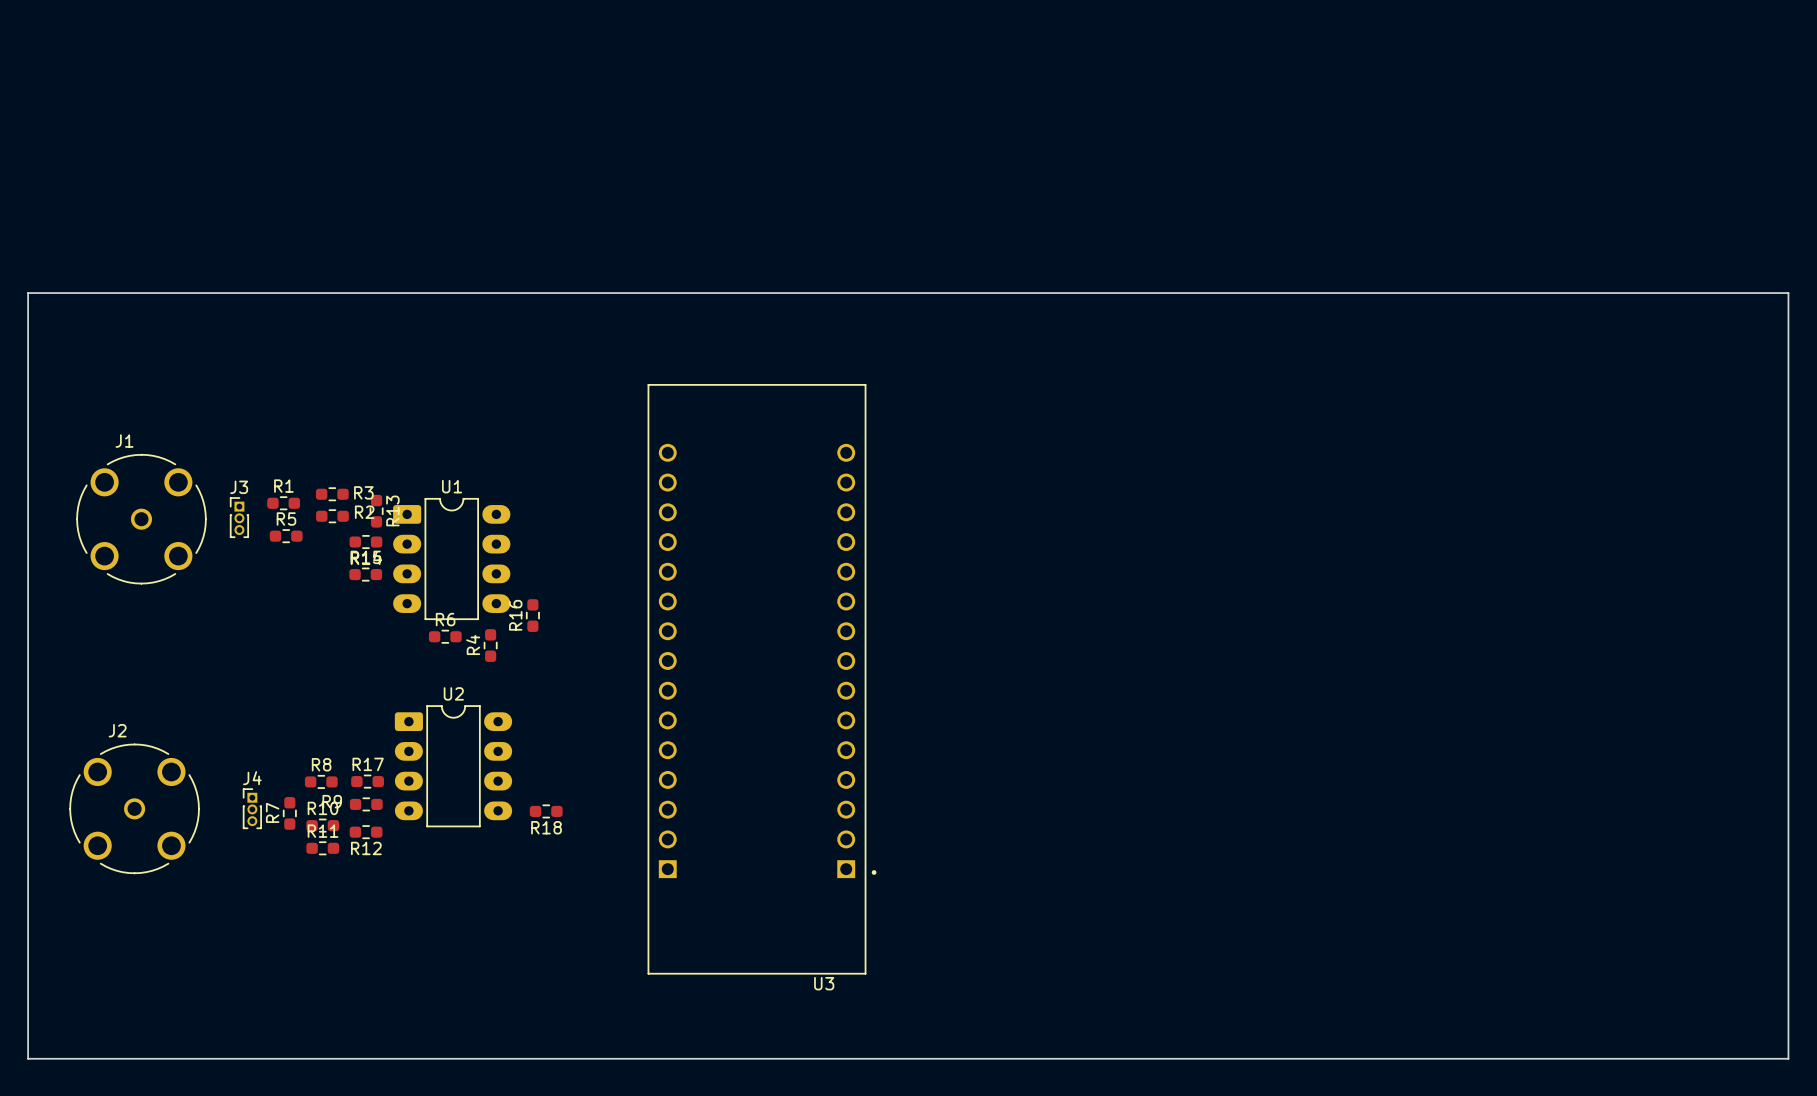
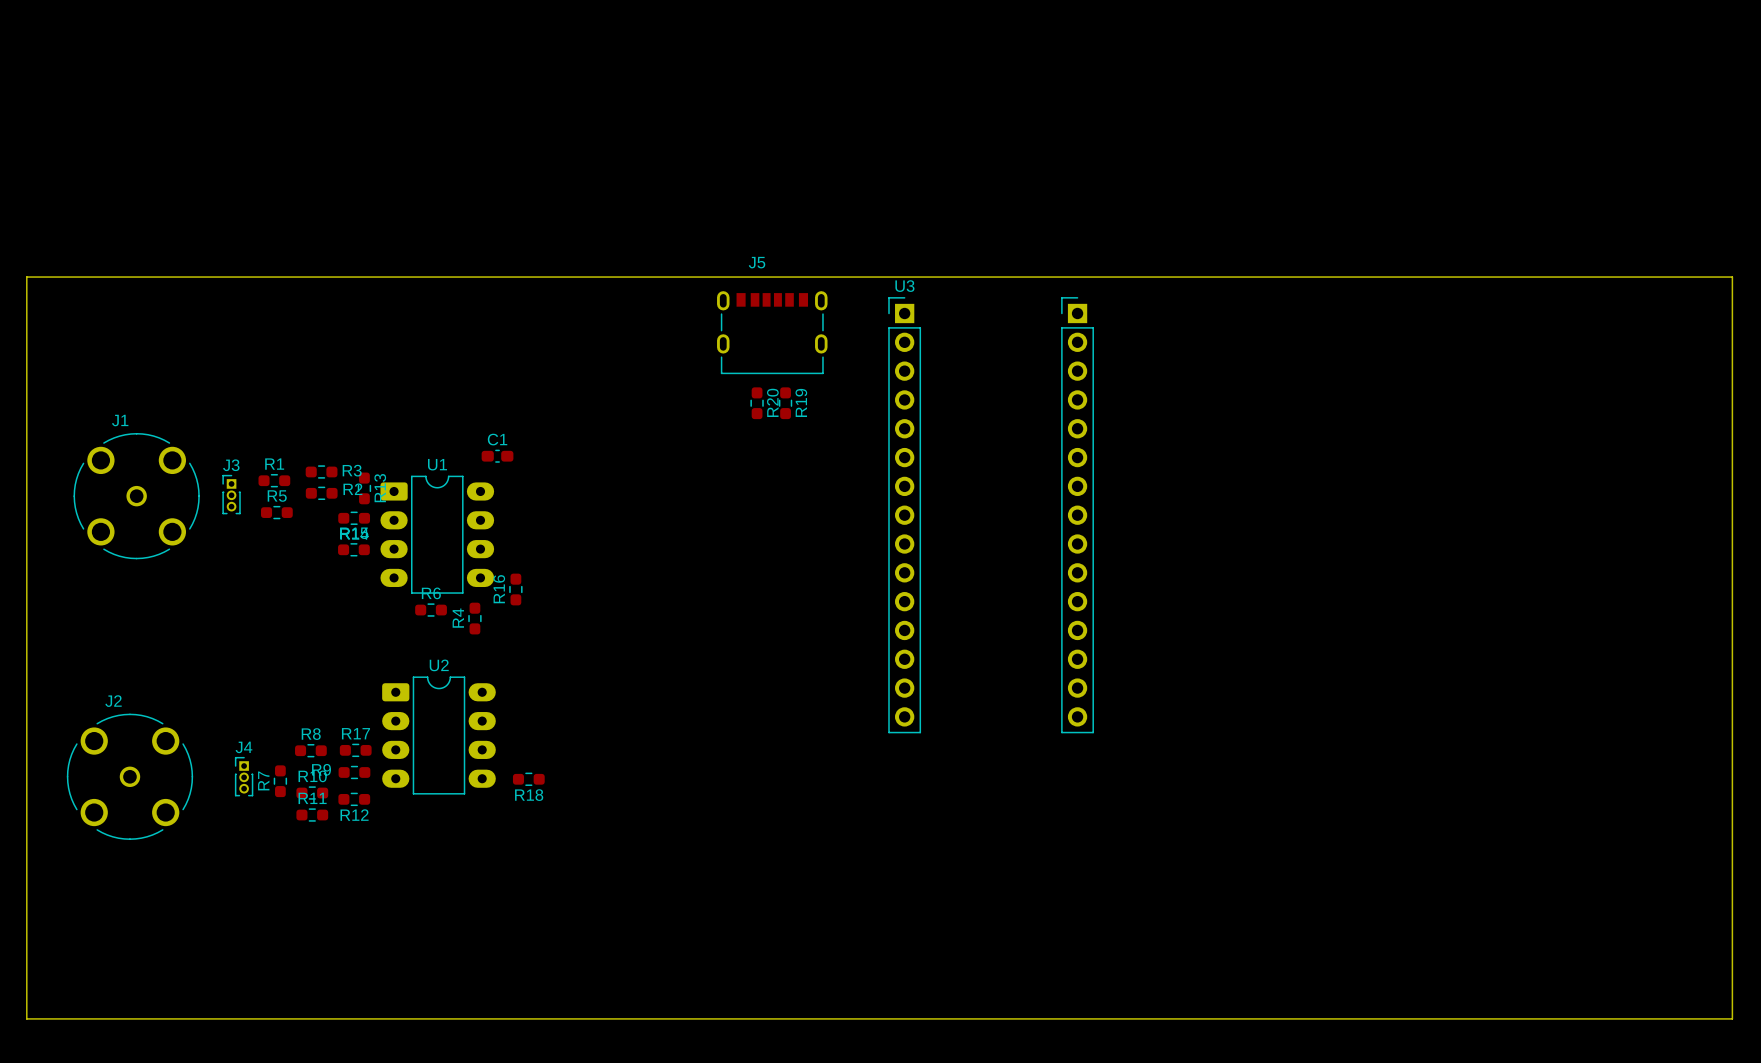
J5: none -> (772, 332)
U3 footprint: [647, 384, 877, 975] -> [888, 297, 1094, 734]
R20: none -> (757, 403)
R19: none -> (785, 403)
C1: none -> (497, 456)
U3 name position: U3 (824, 983) -> U3 (904, 286)

